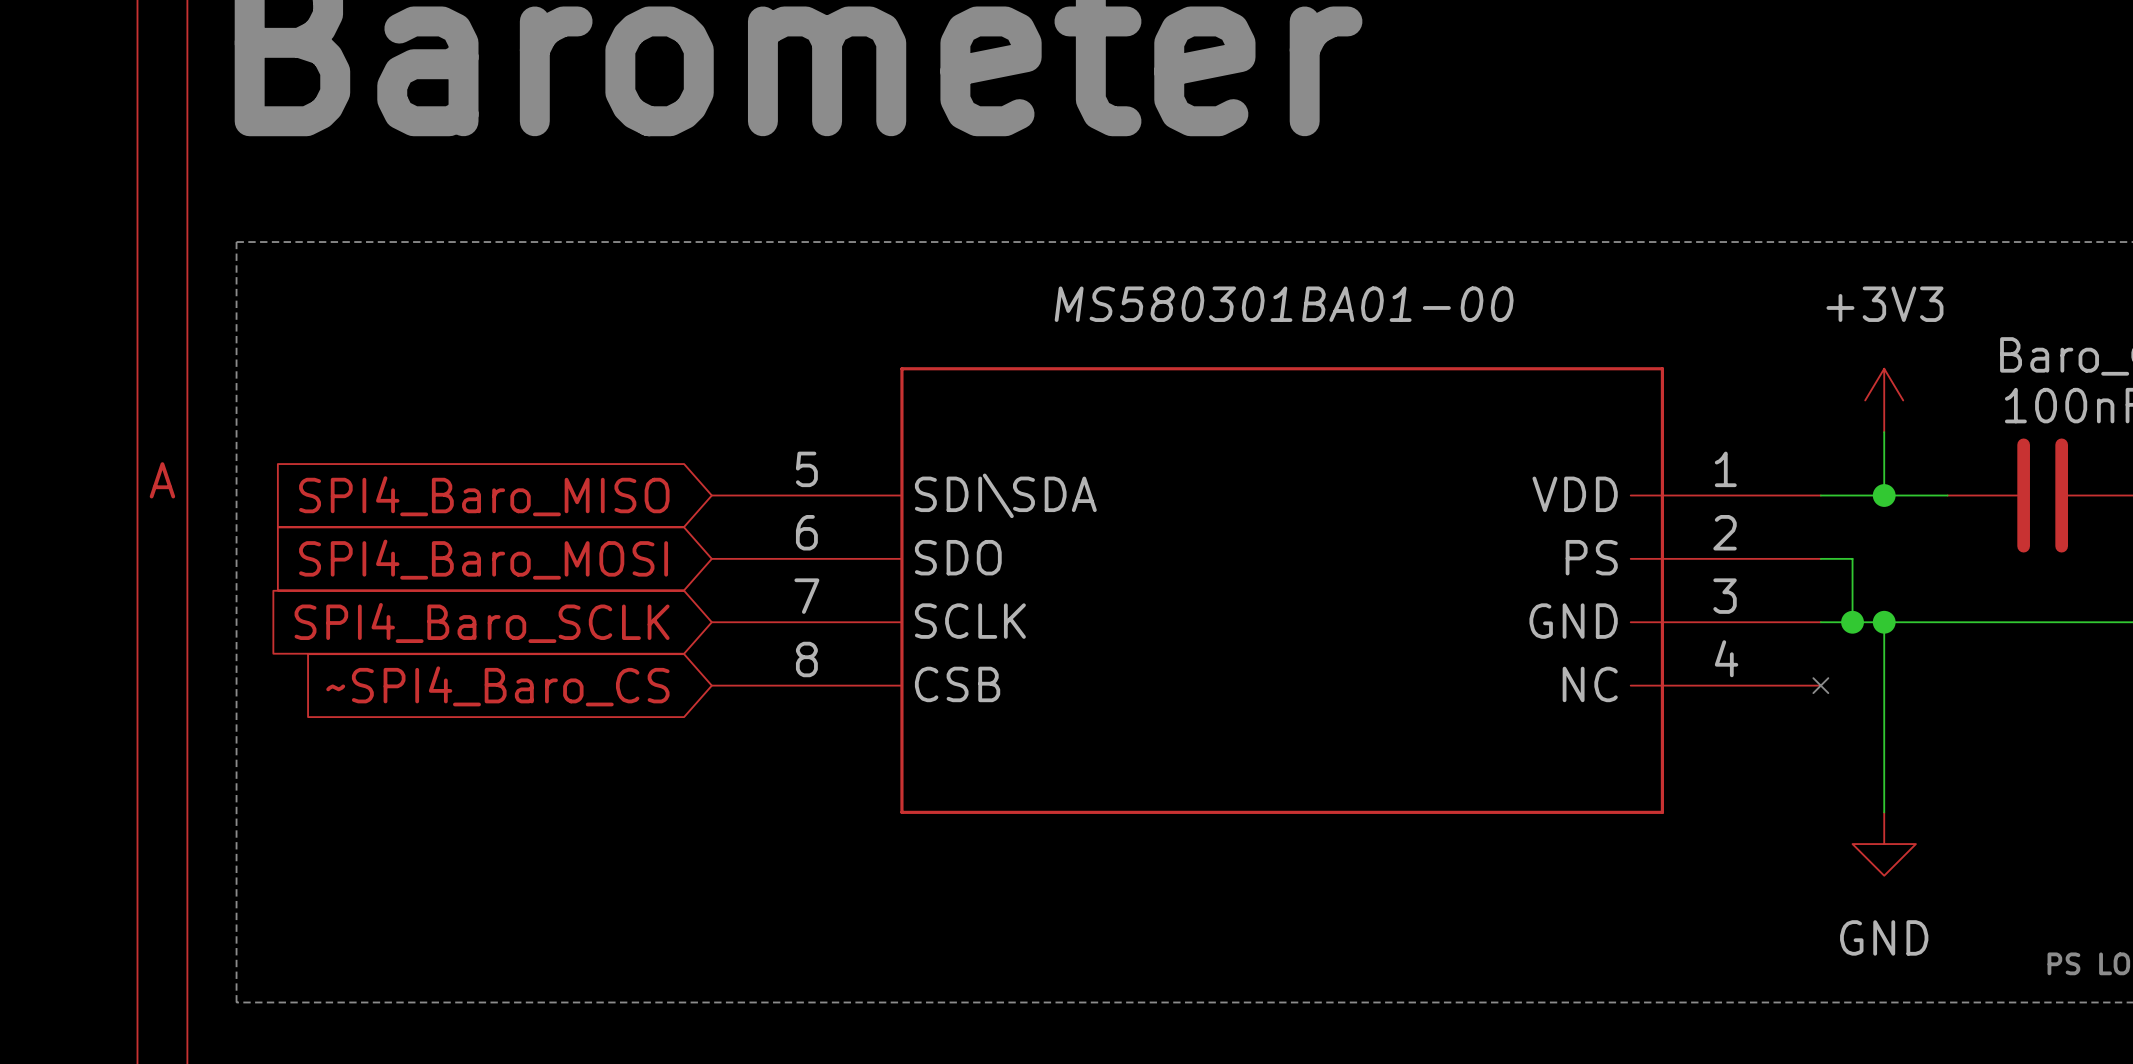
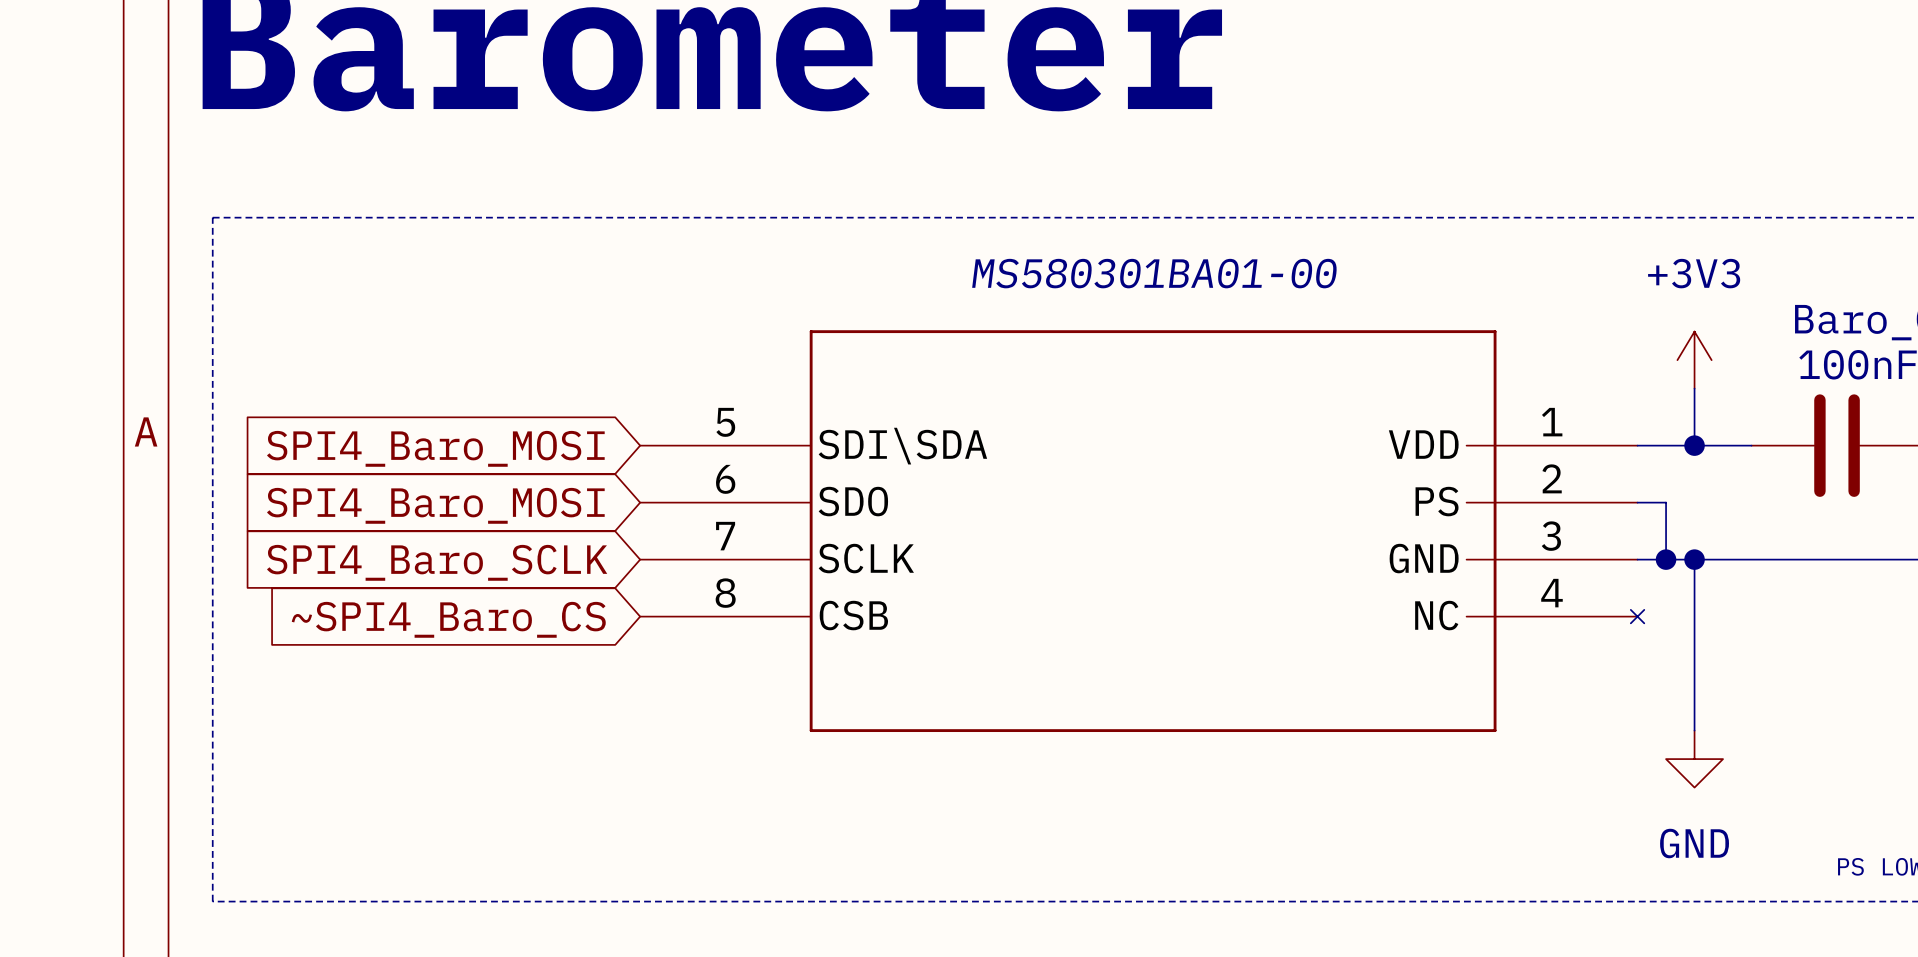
global label: SPI4_Baro_MISO (484, 496) -> SPI4_Baro_MOSI (435, 448)

